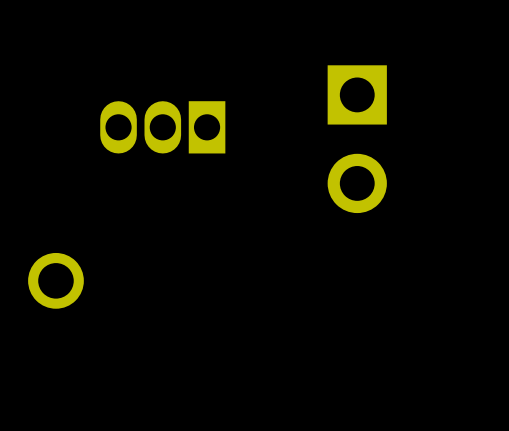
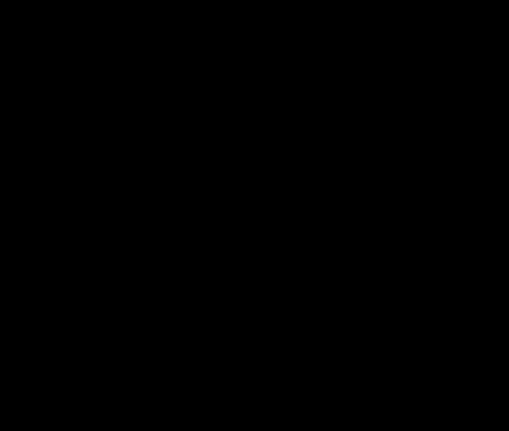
part: (162, 127) -> none
part: (357, 139) -> none
part: (55, 280) -> none

